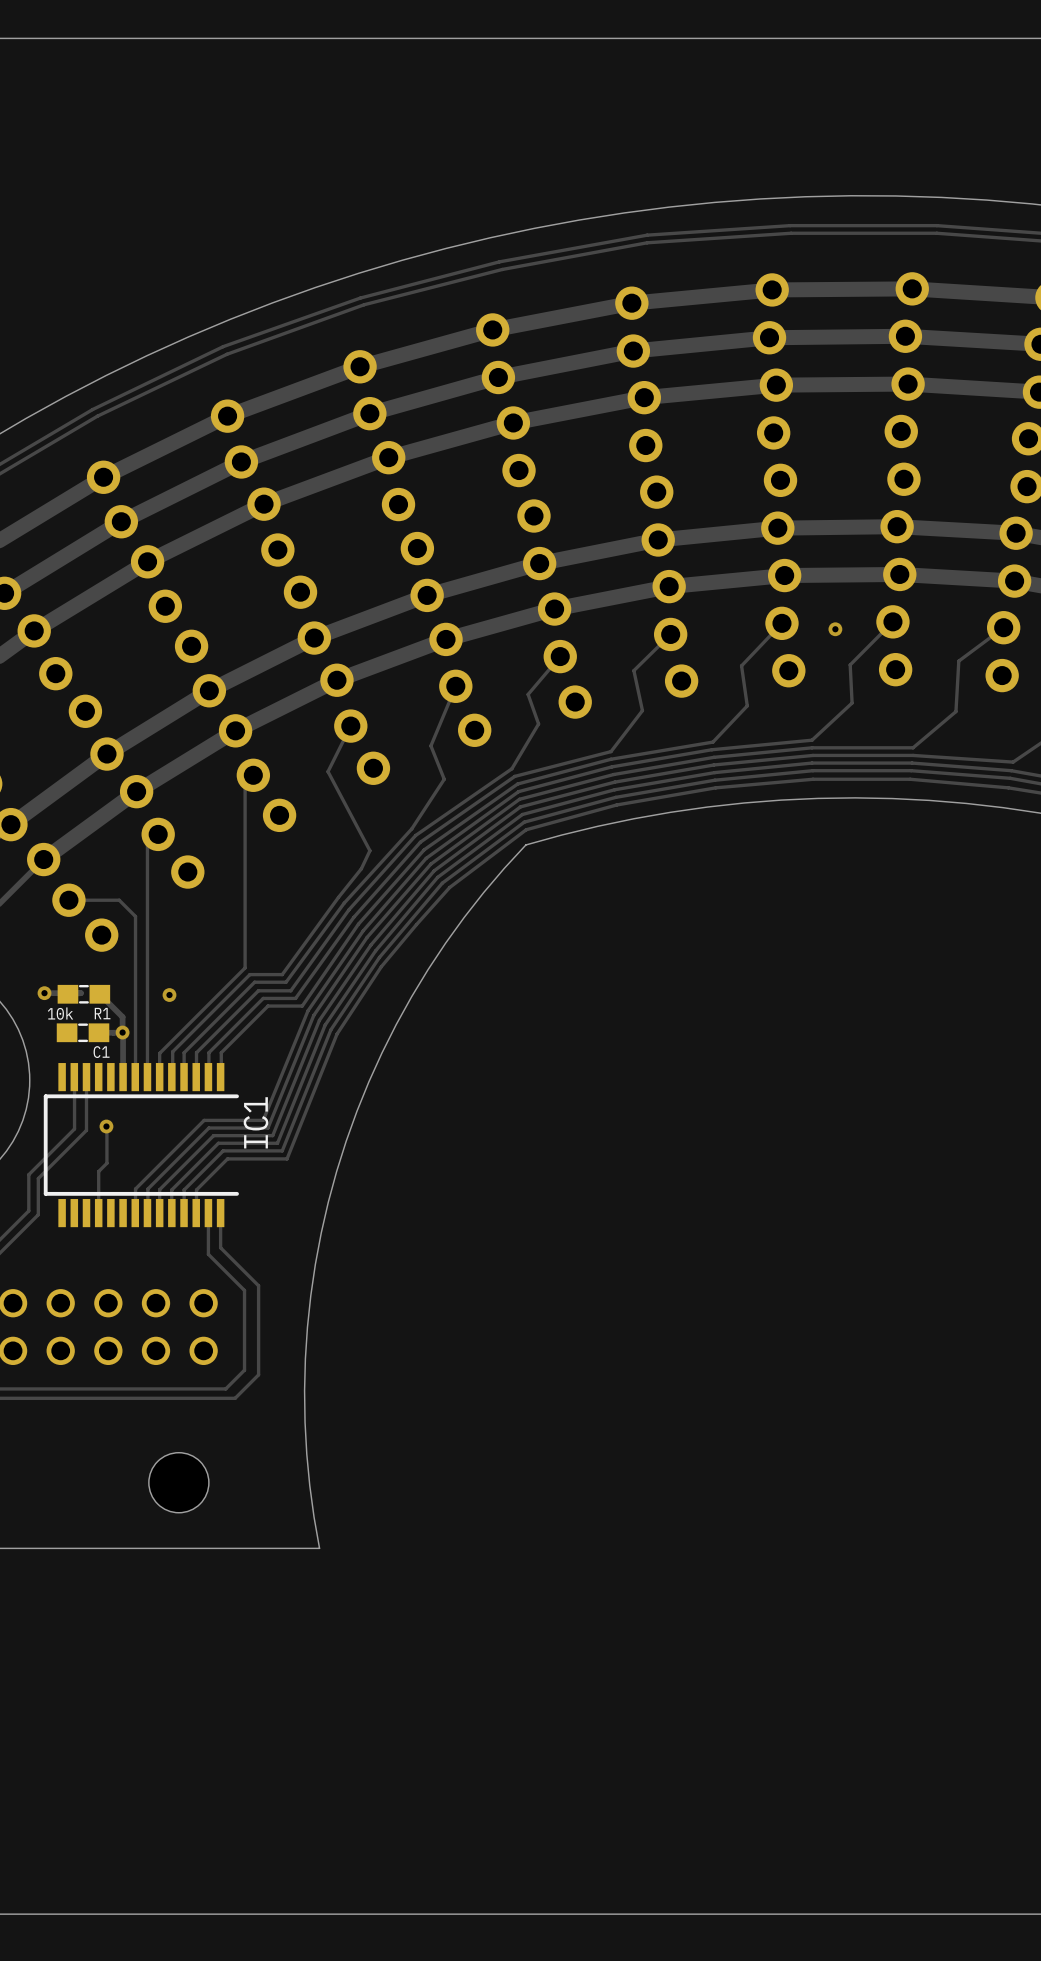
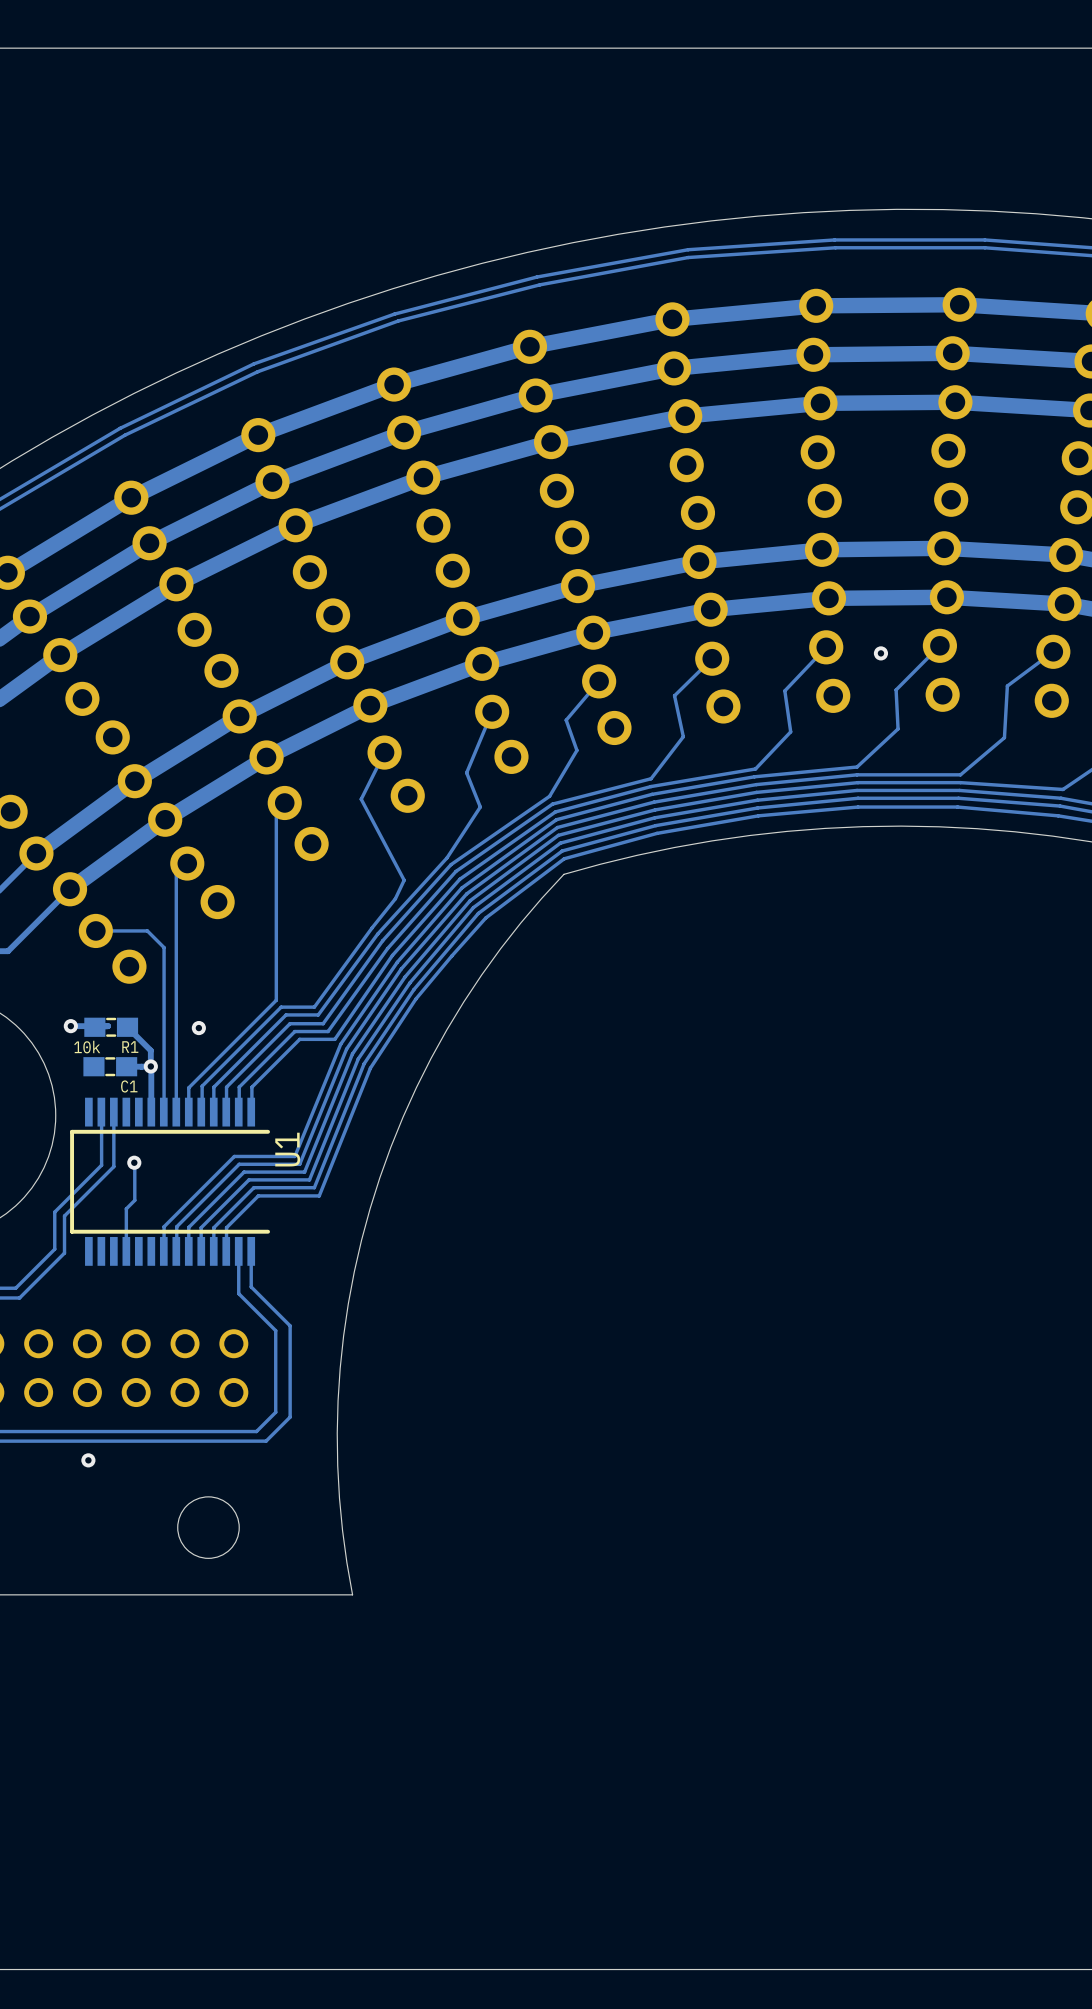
IC1 name: IC1 (255, 1122) -> U1 (287, 1149)
via: none -> (88, 1460)

